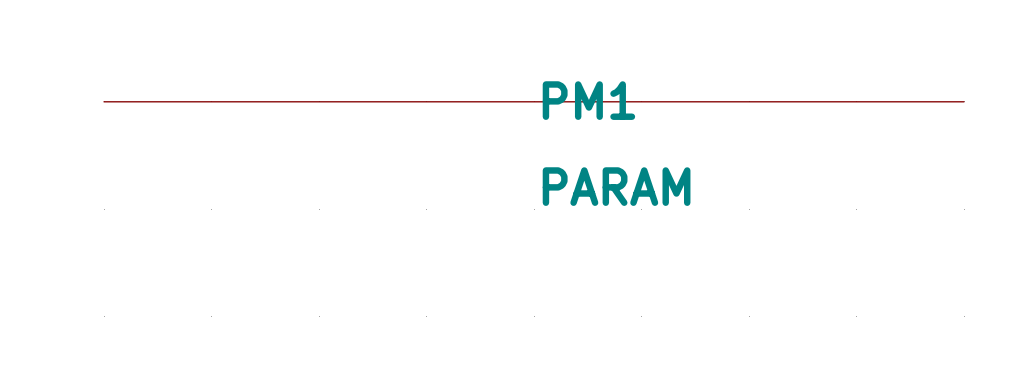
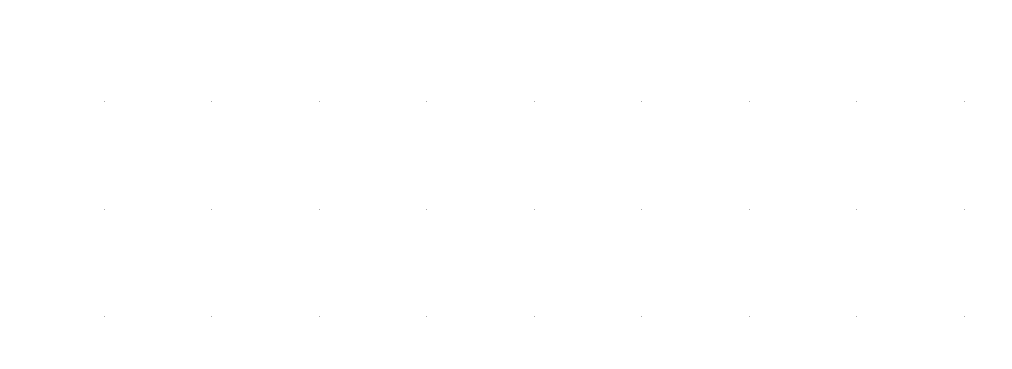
PM1: PARAM (534, 101) -> none

